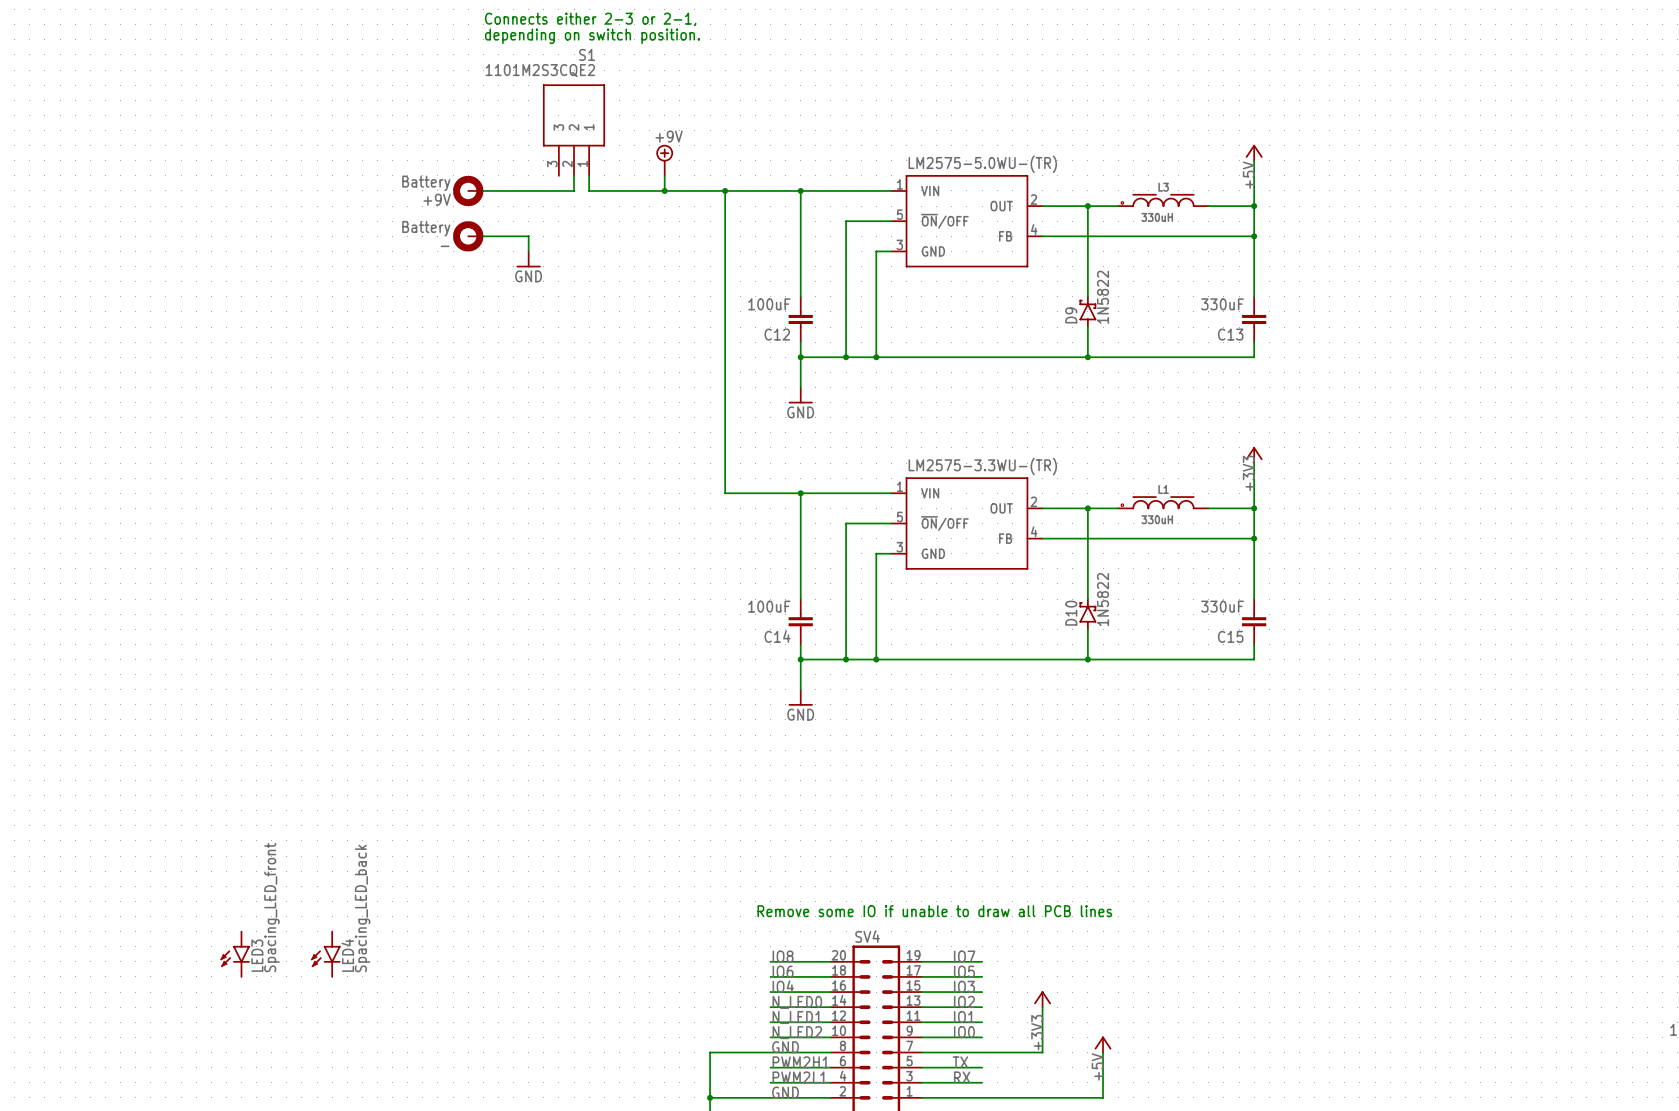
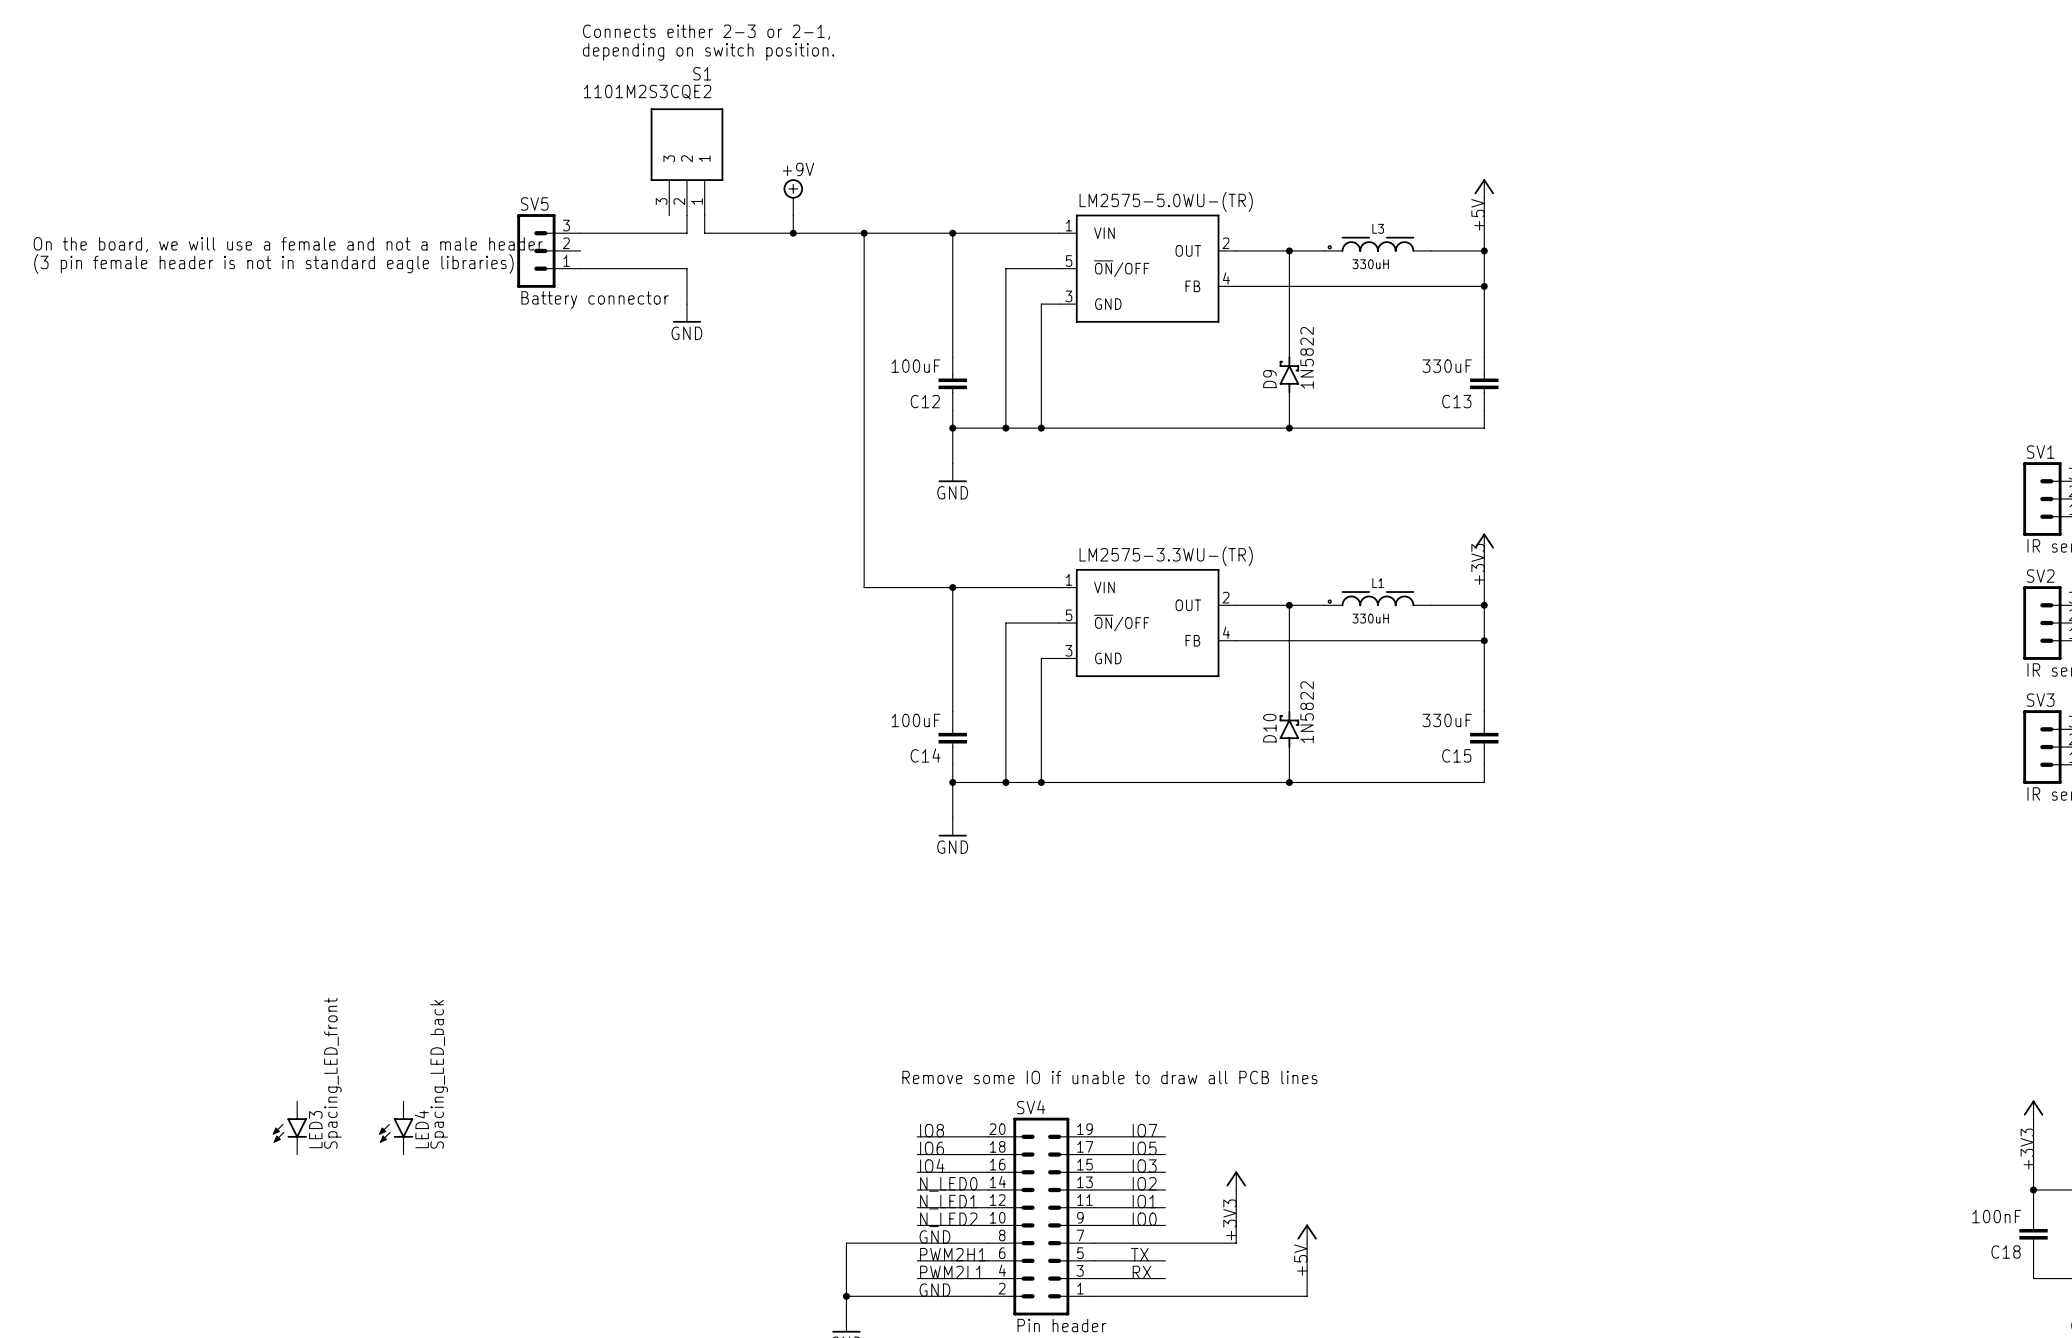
+9V: Battery (468, 190) -> none
text: none -> On the board, we will use a female and not a male header (288, 244)
SV5: none -> Battery connector (548, 250)
text: none -> (3 pin female header is not in standard eagle libraries). (276, 263)
wire: none -> (580, 268) (686, 268) (686, 304)
part: Battery (468, 236) -> none
wire: (483, 236) (528, 236) (528, 251) -> none
power symbol position: GND (528, 259) -> GND (686, 313)

